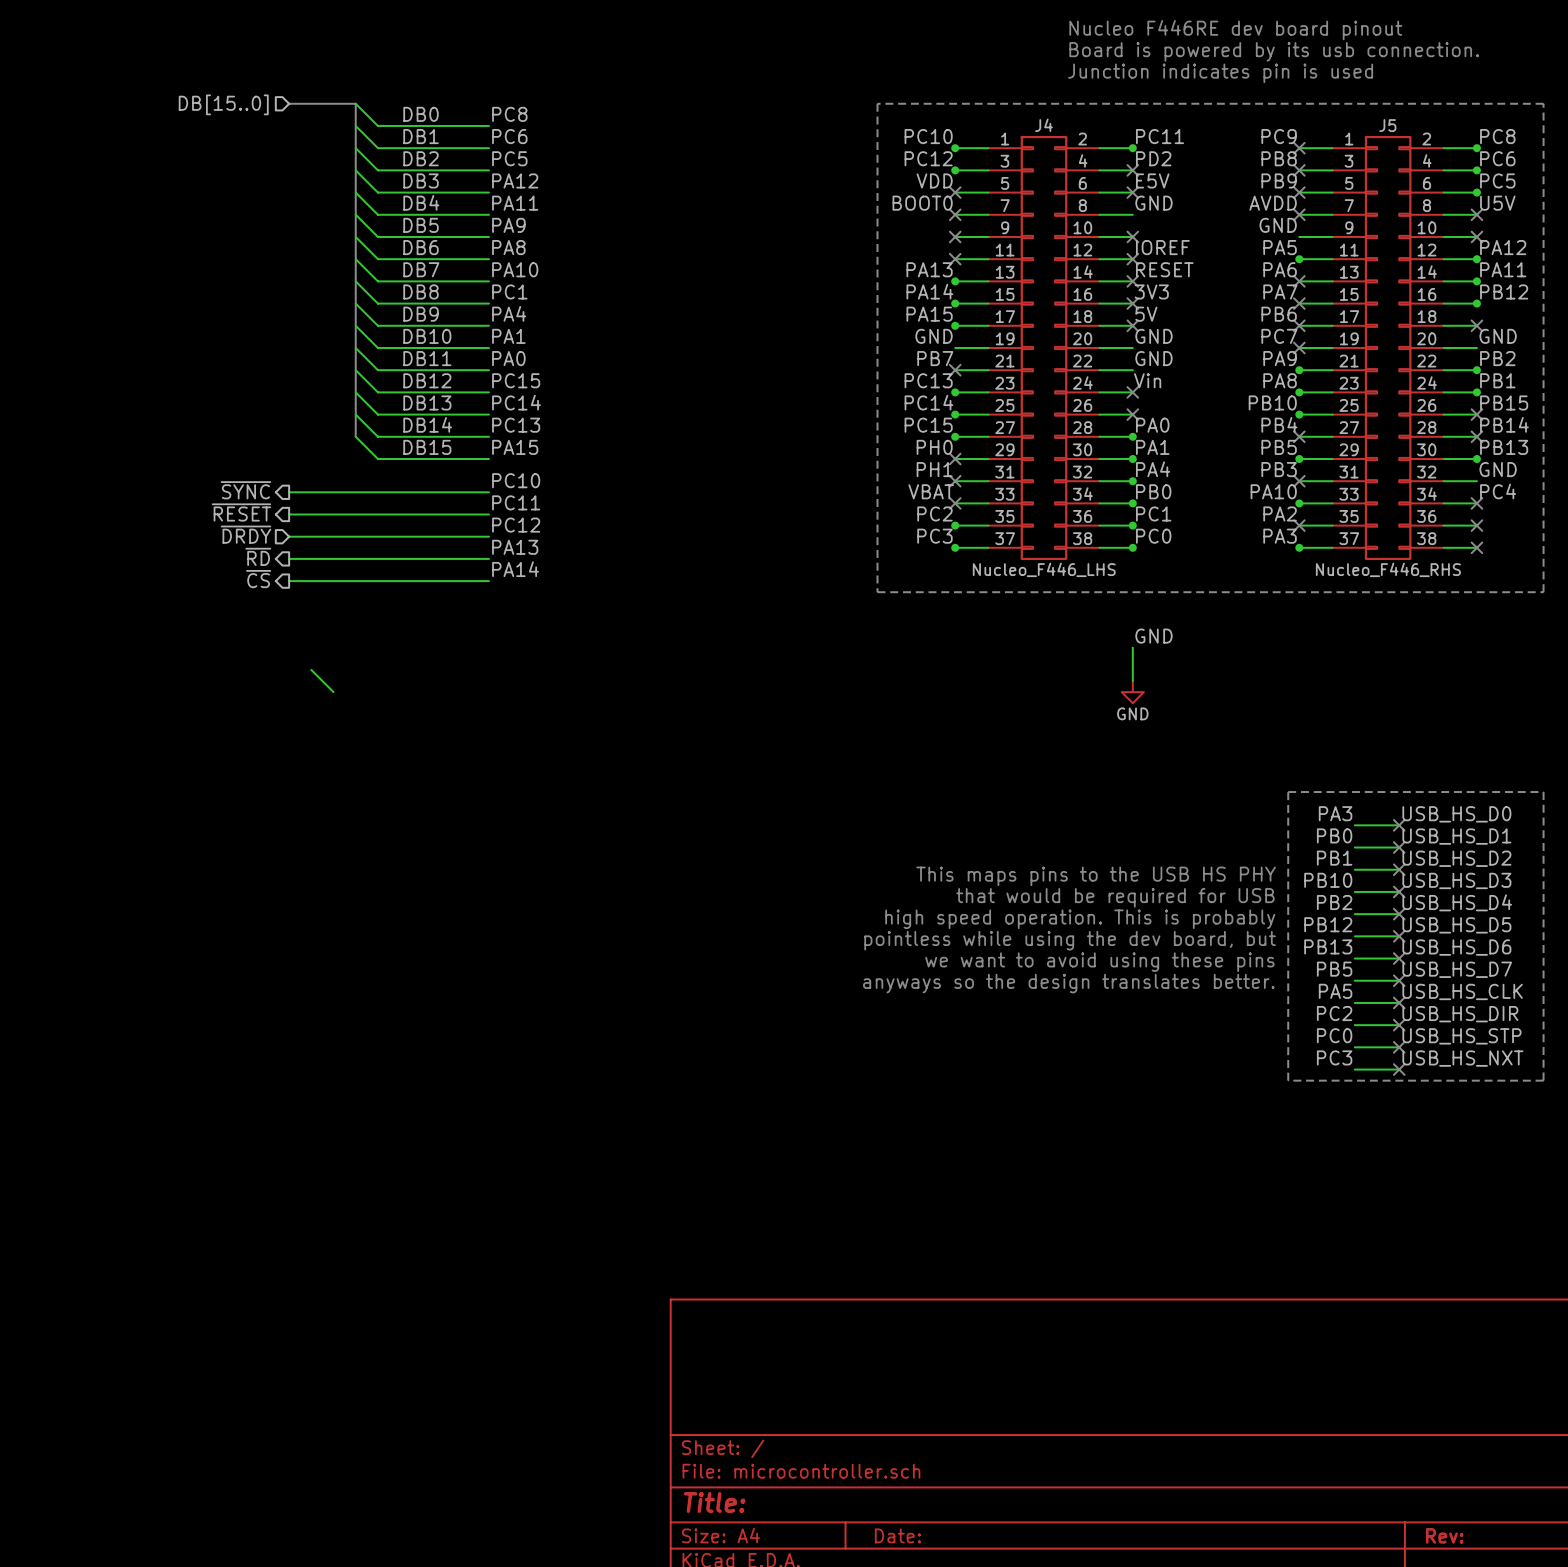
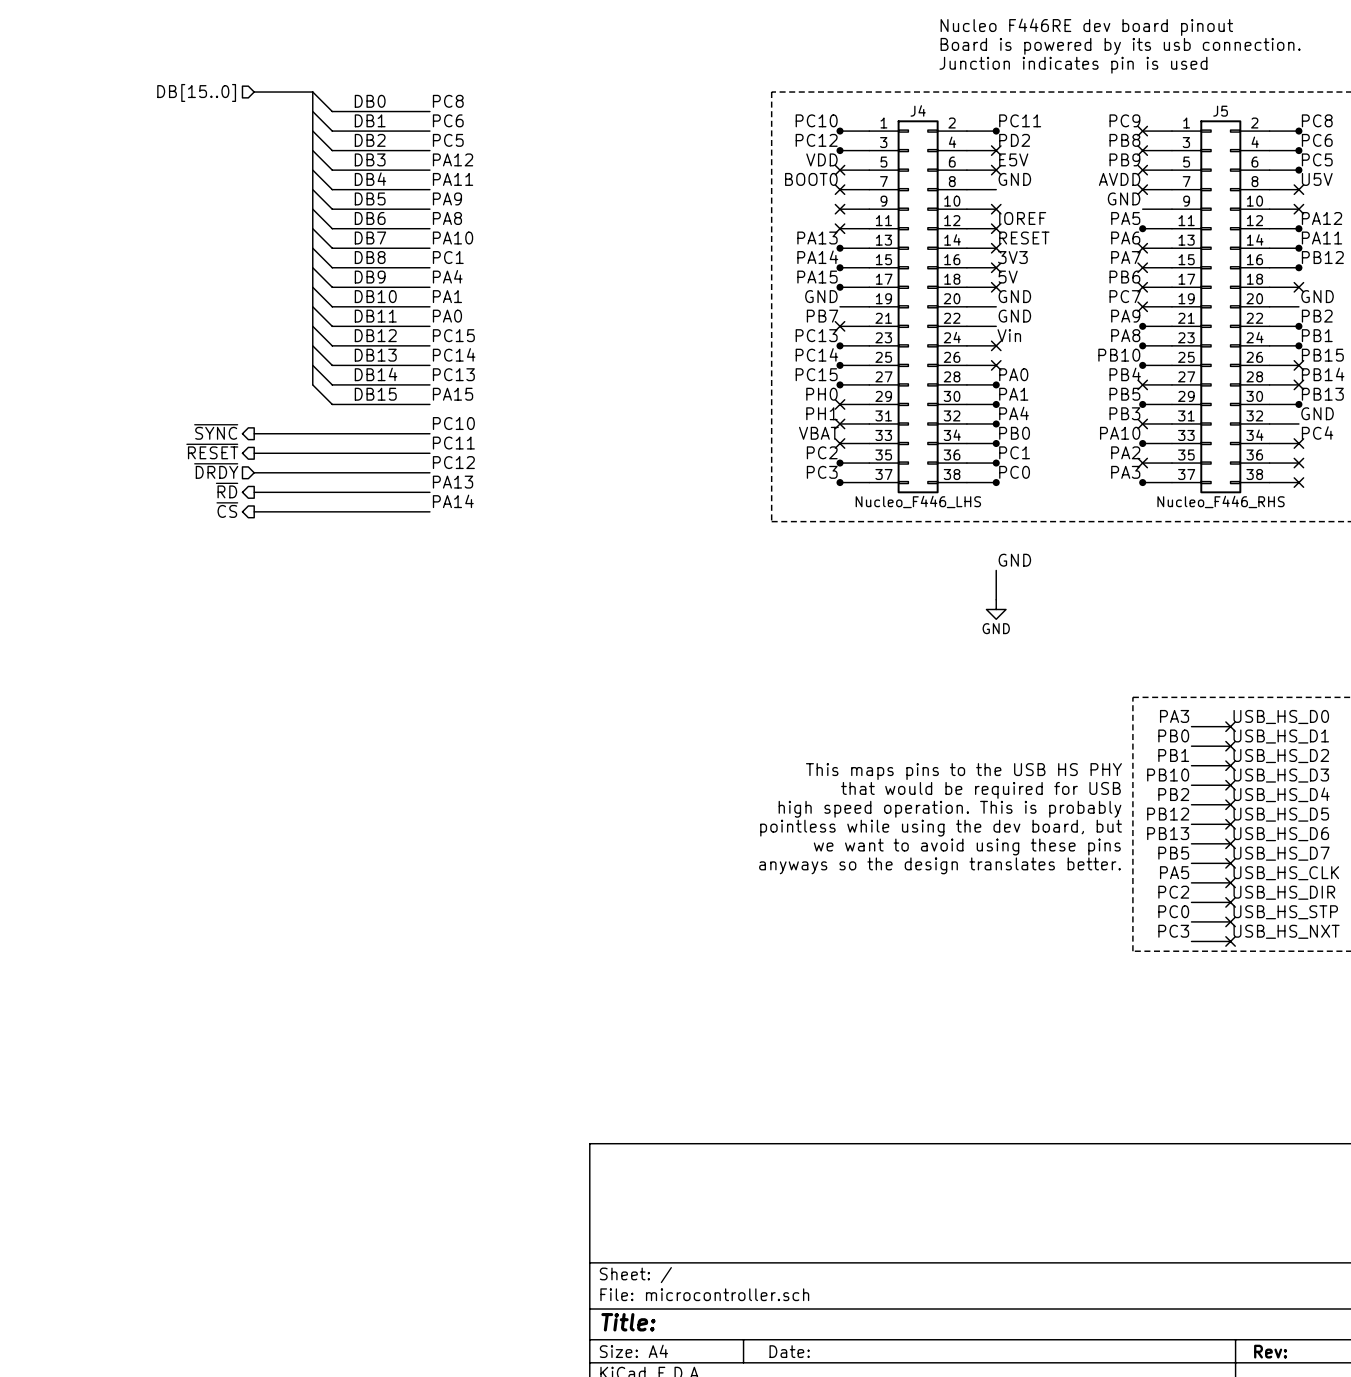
wire: (311, 669) (333, 692) -> none

